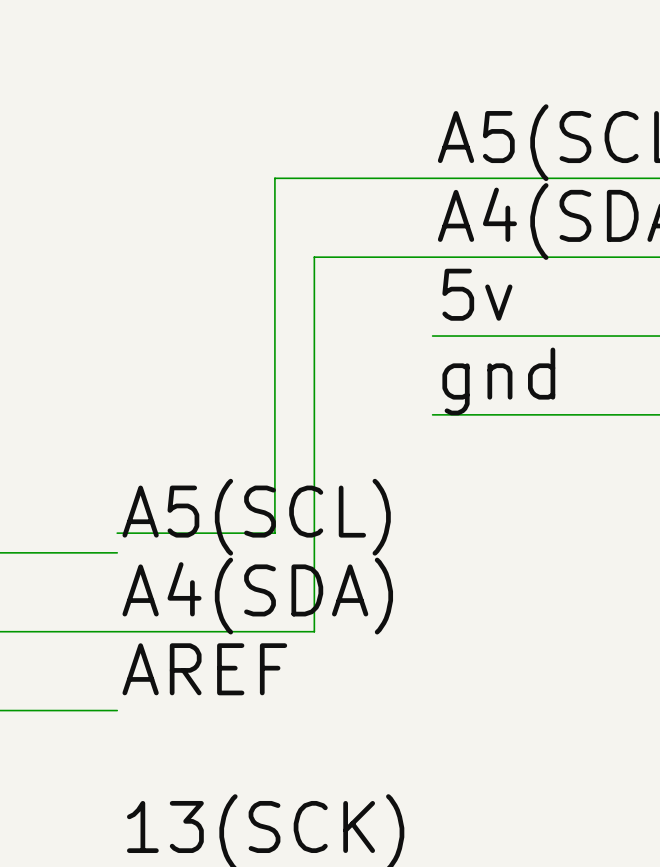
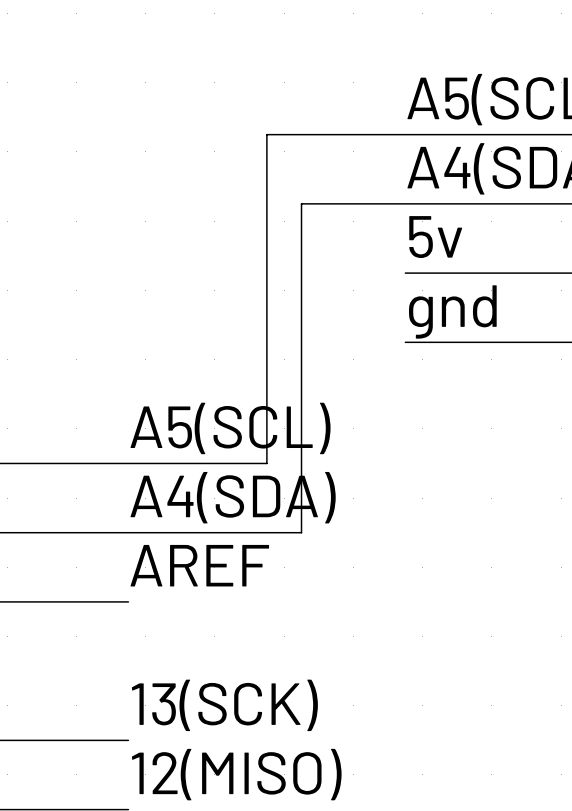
wire: (117, 533) (274, 533) -> (128, 463) (266, 463) (266, 446)

